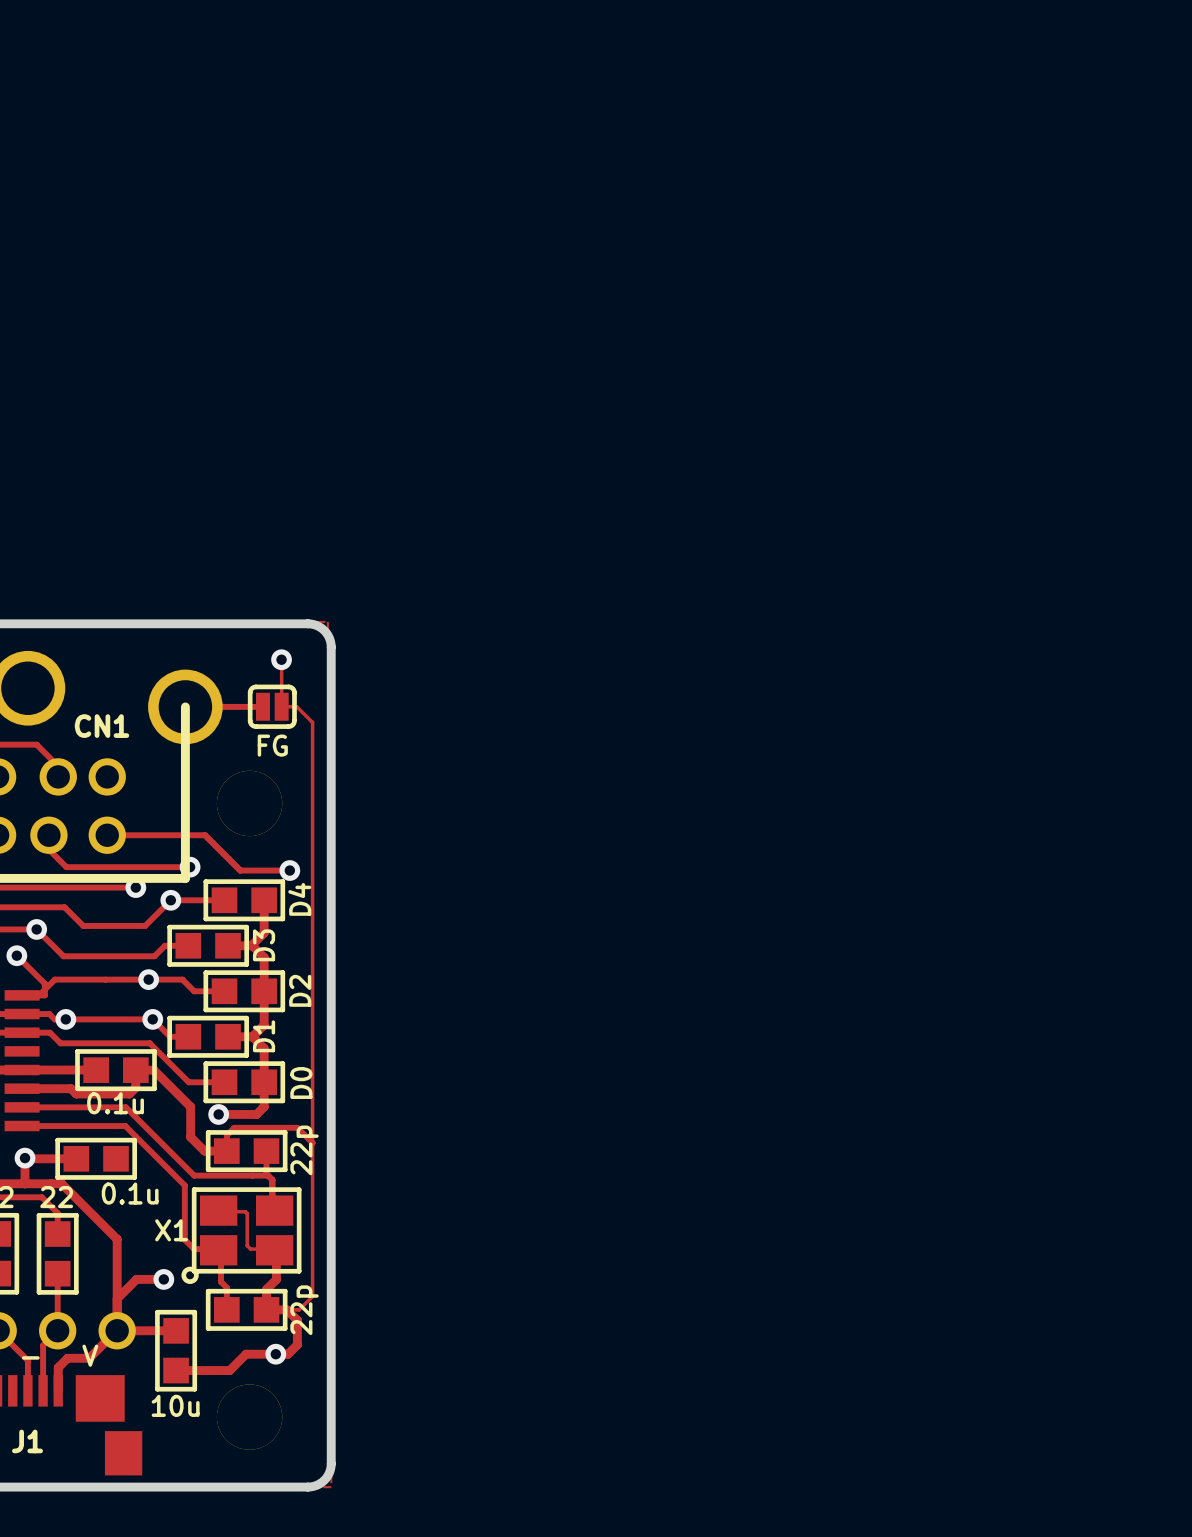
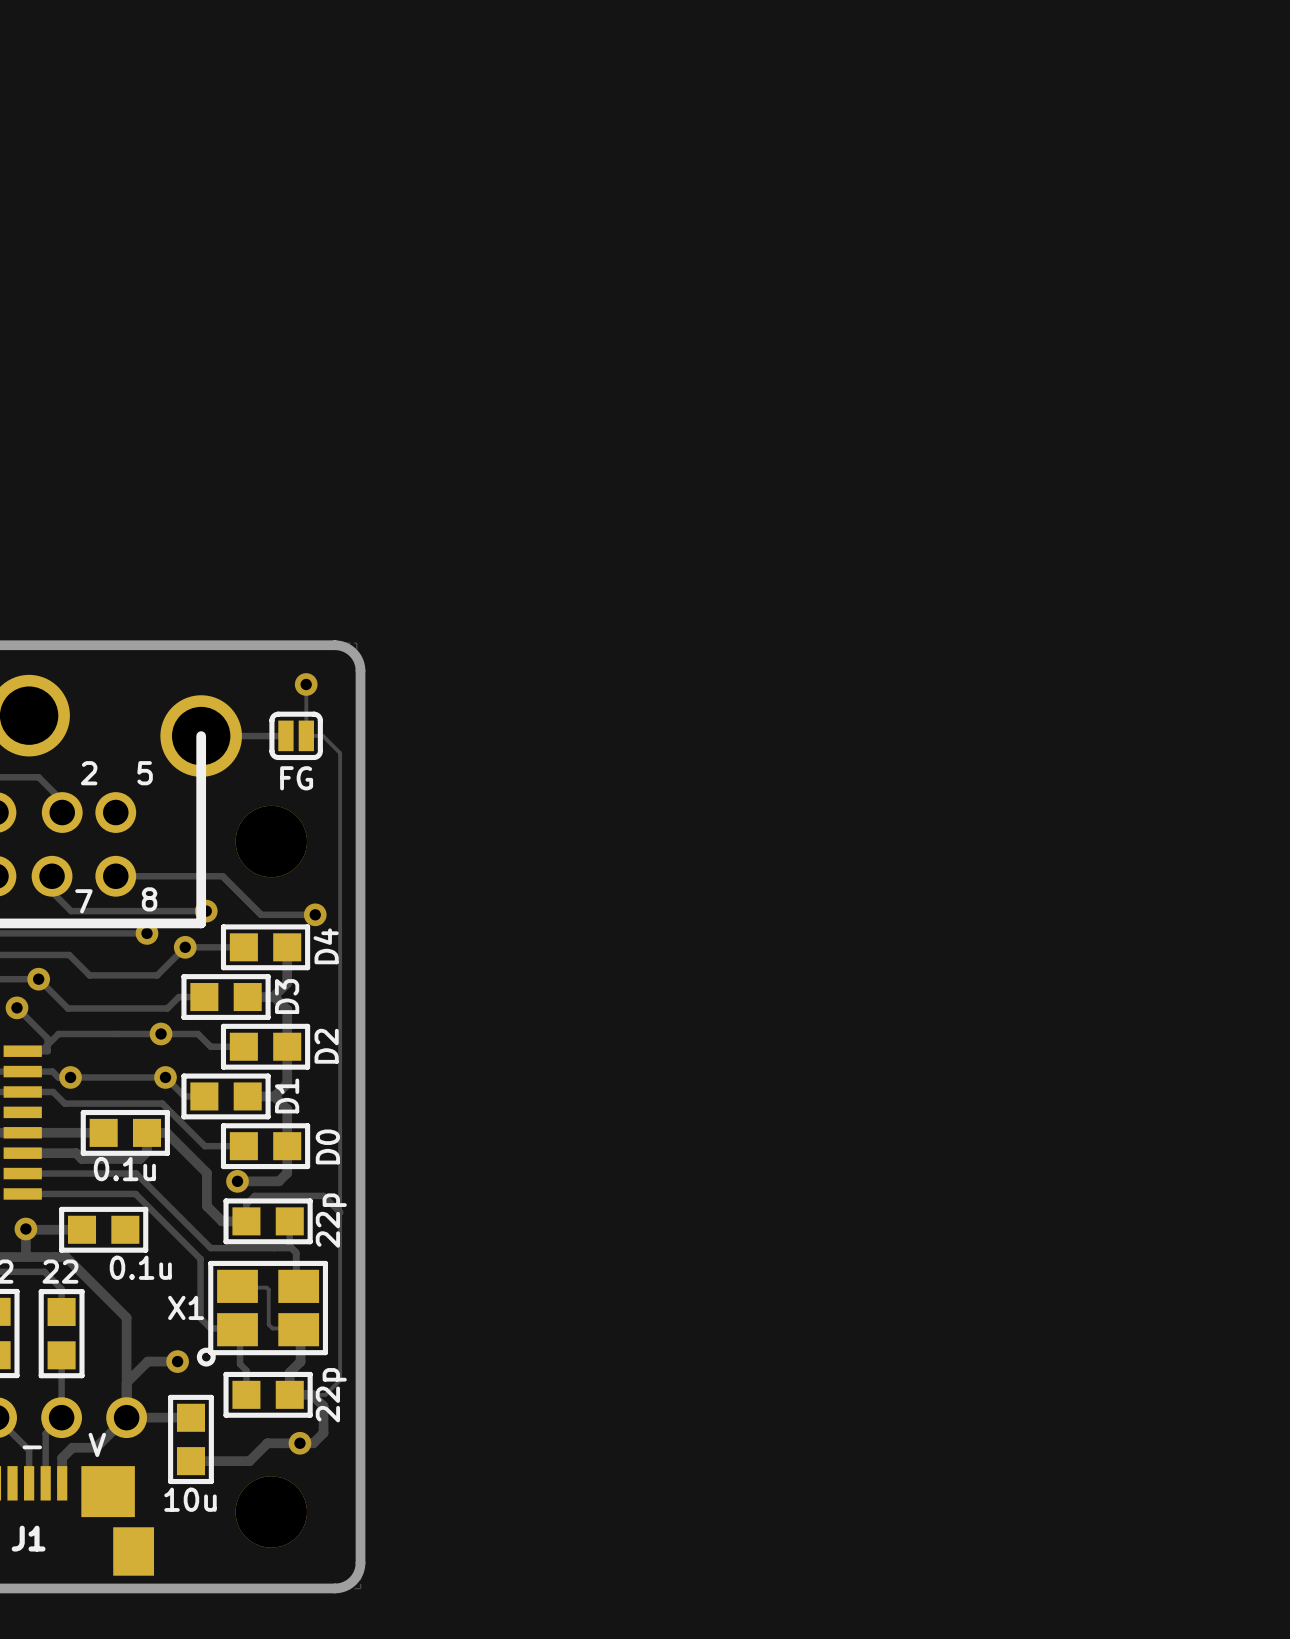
CN1 name: CN1 (102, 726) -> none
text: none -> 2 (89, 773)
text: none -> 5 (145, 773)
text: none -> 8 (149, 899)
text: none -> 7 (83, 901)

